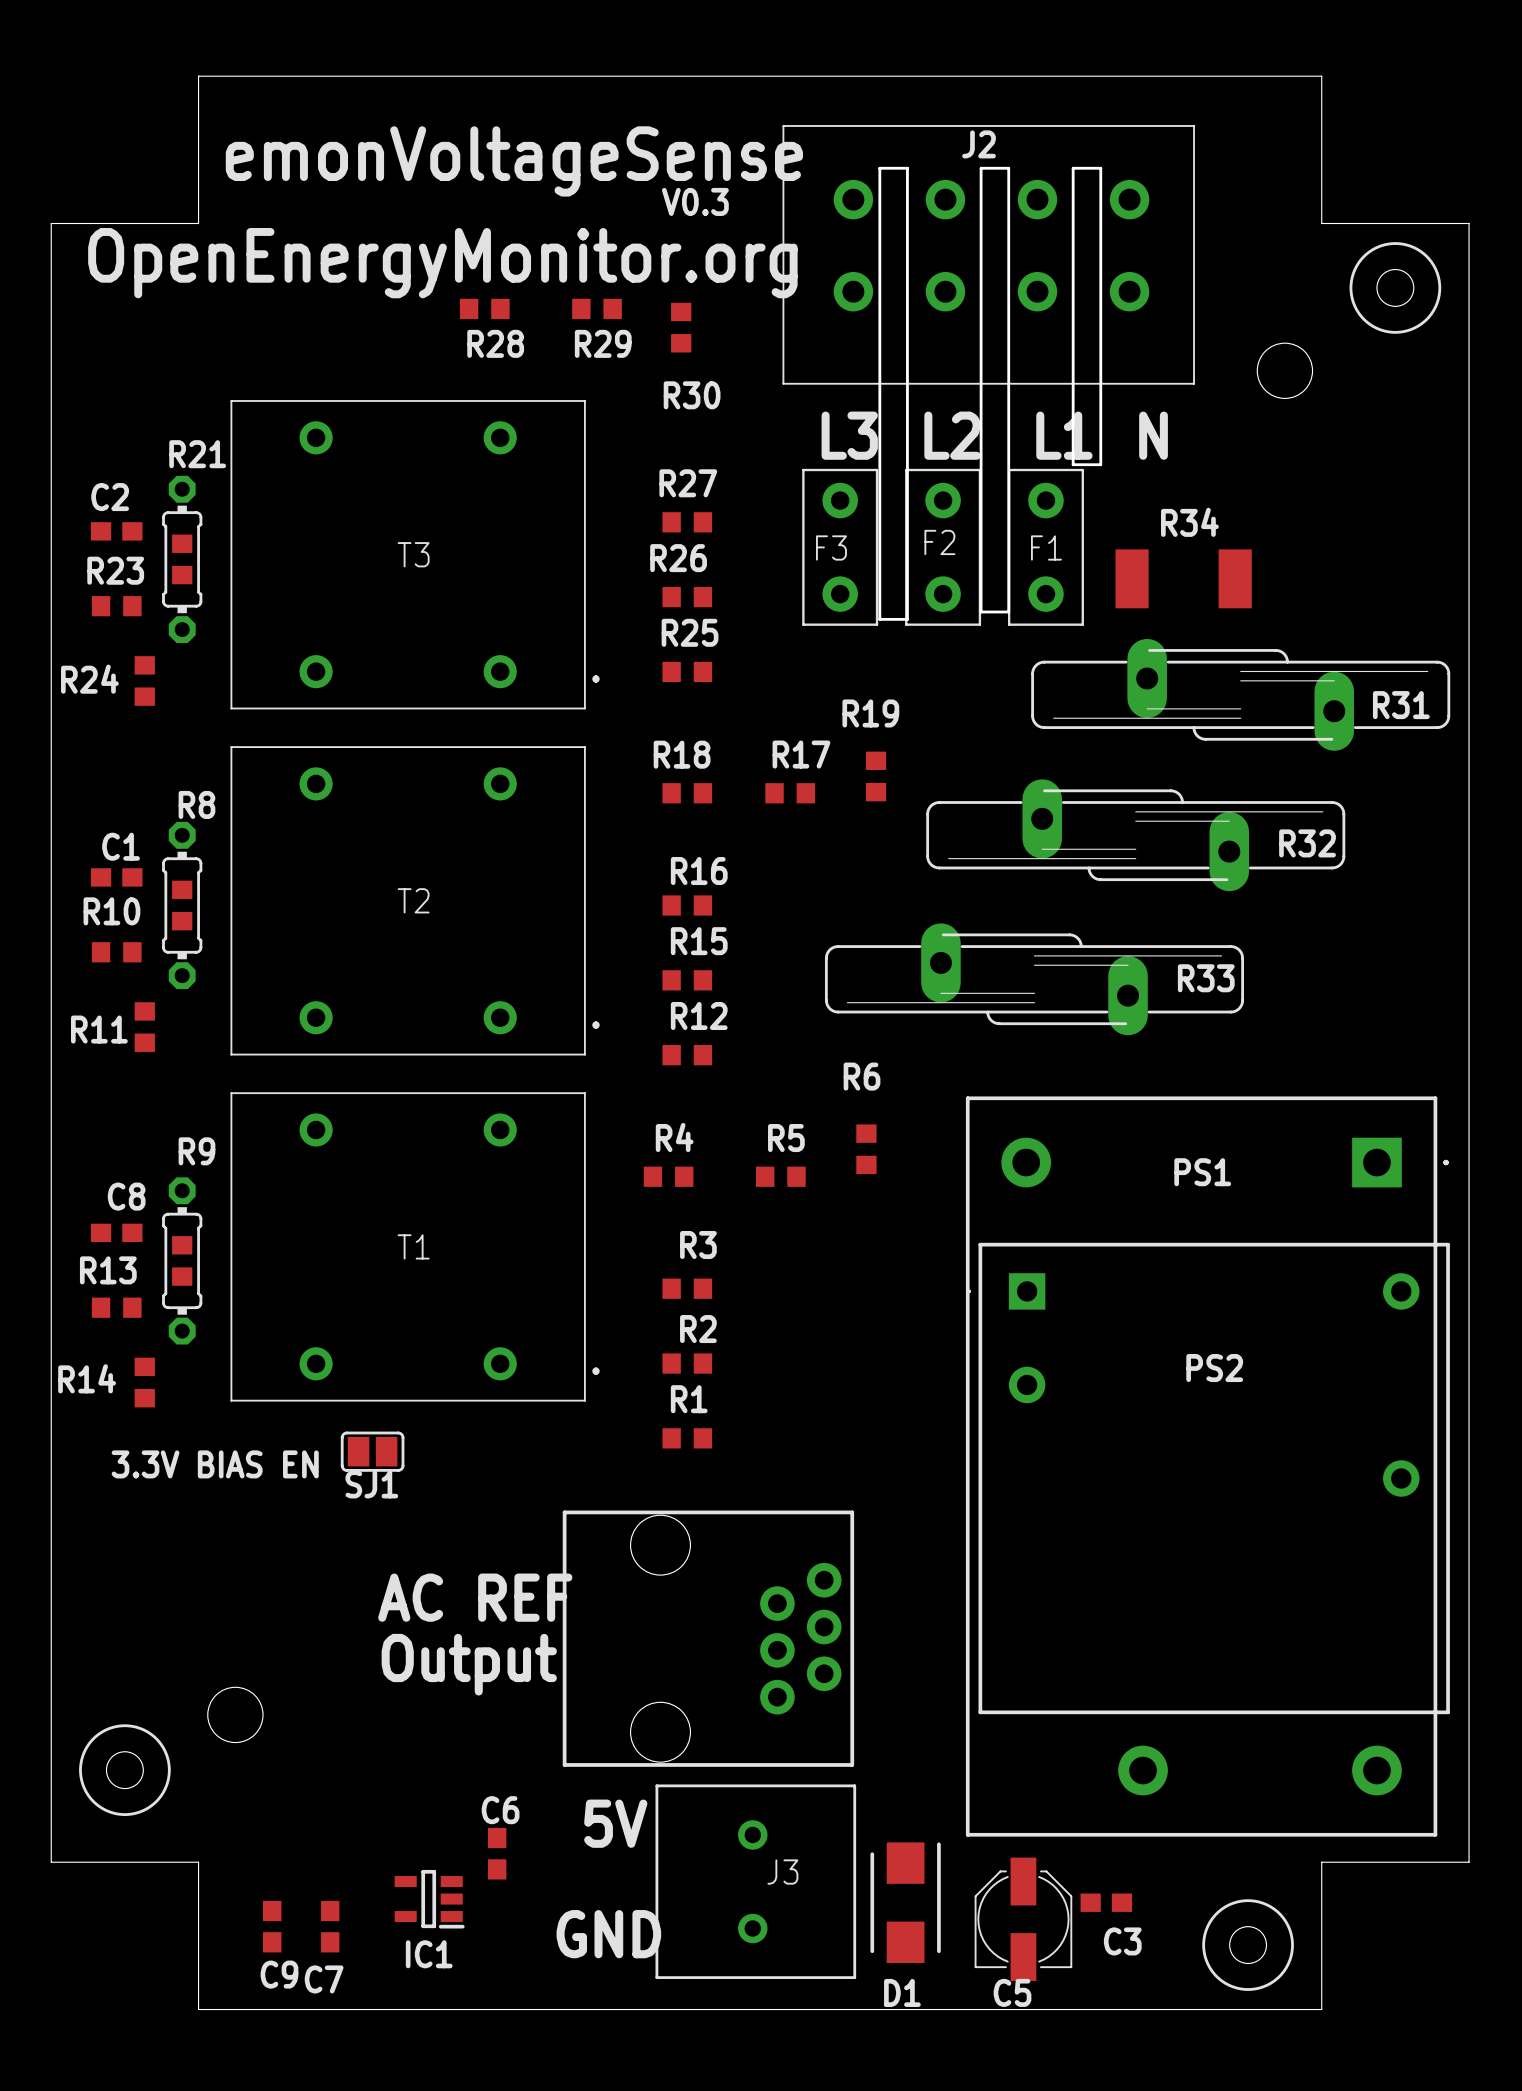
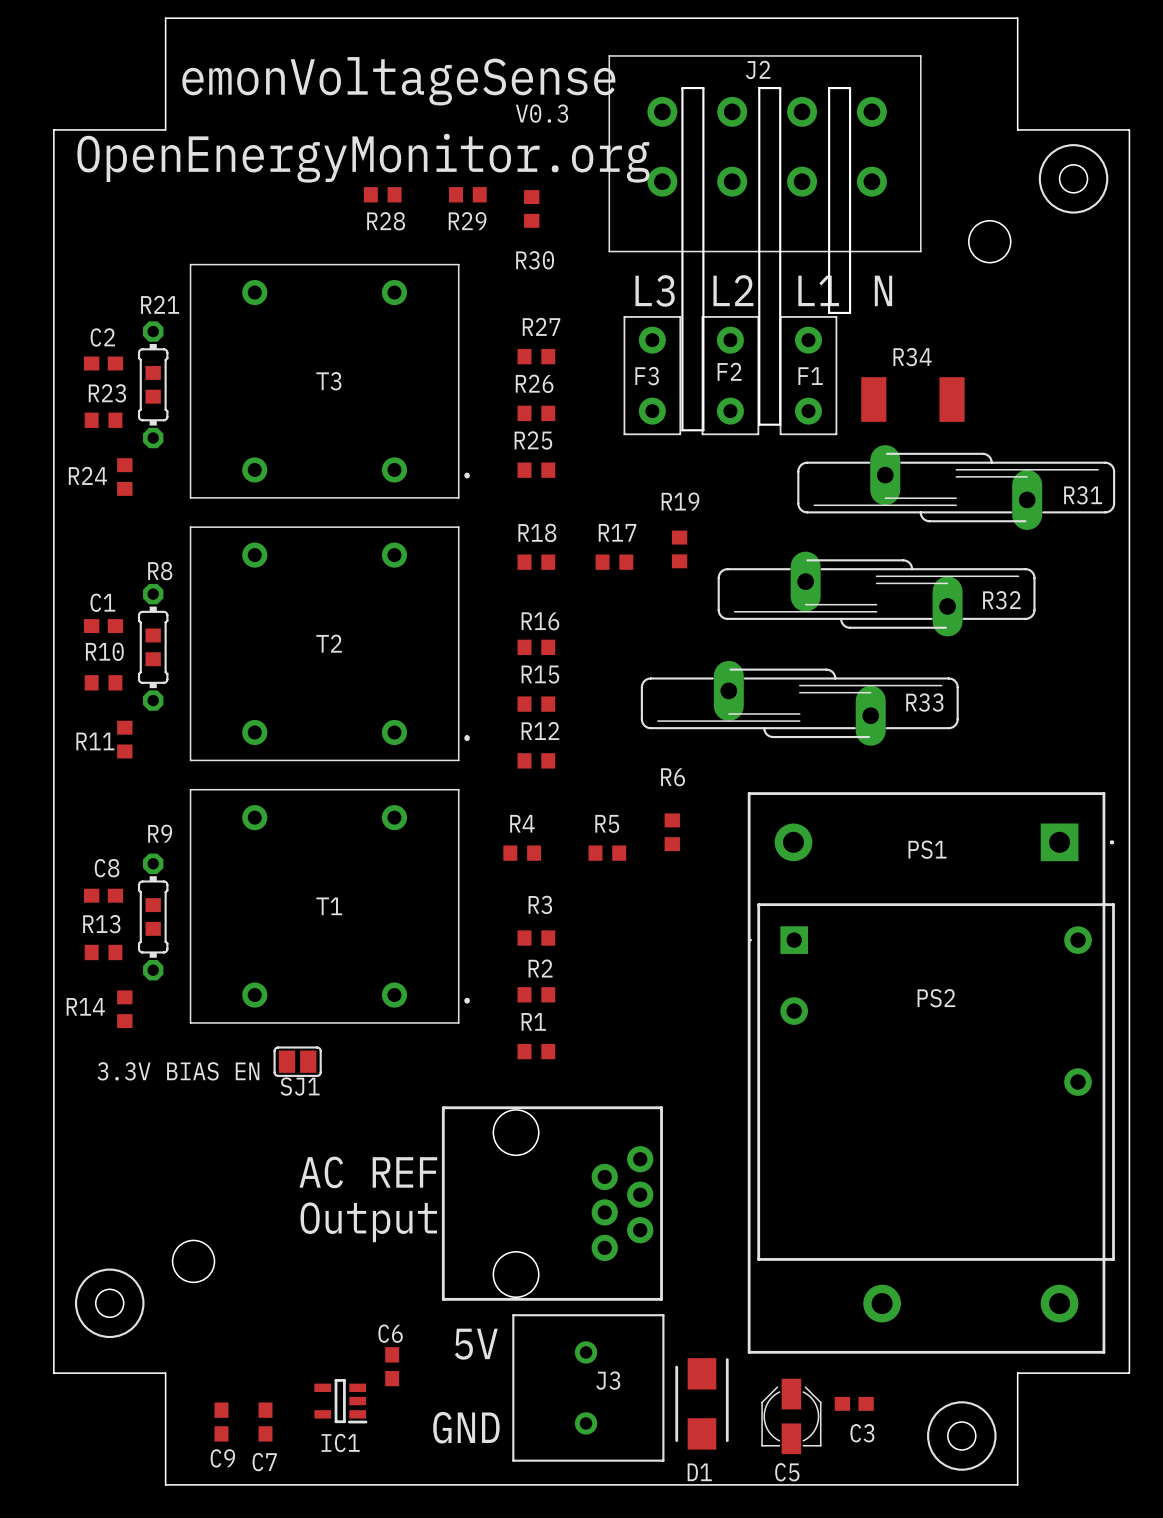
C5 footprint: [974, 1857, 1073, 1981] -> [761, 1378, 822, 1455]

